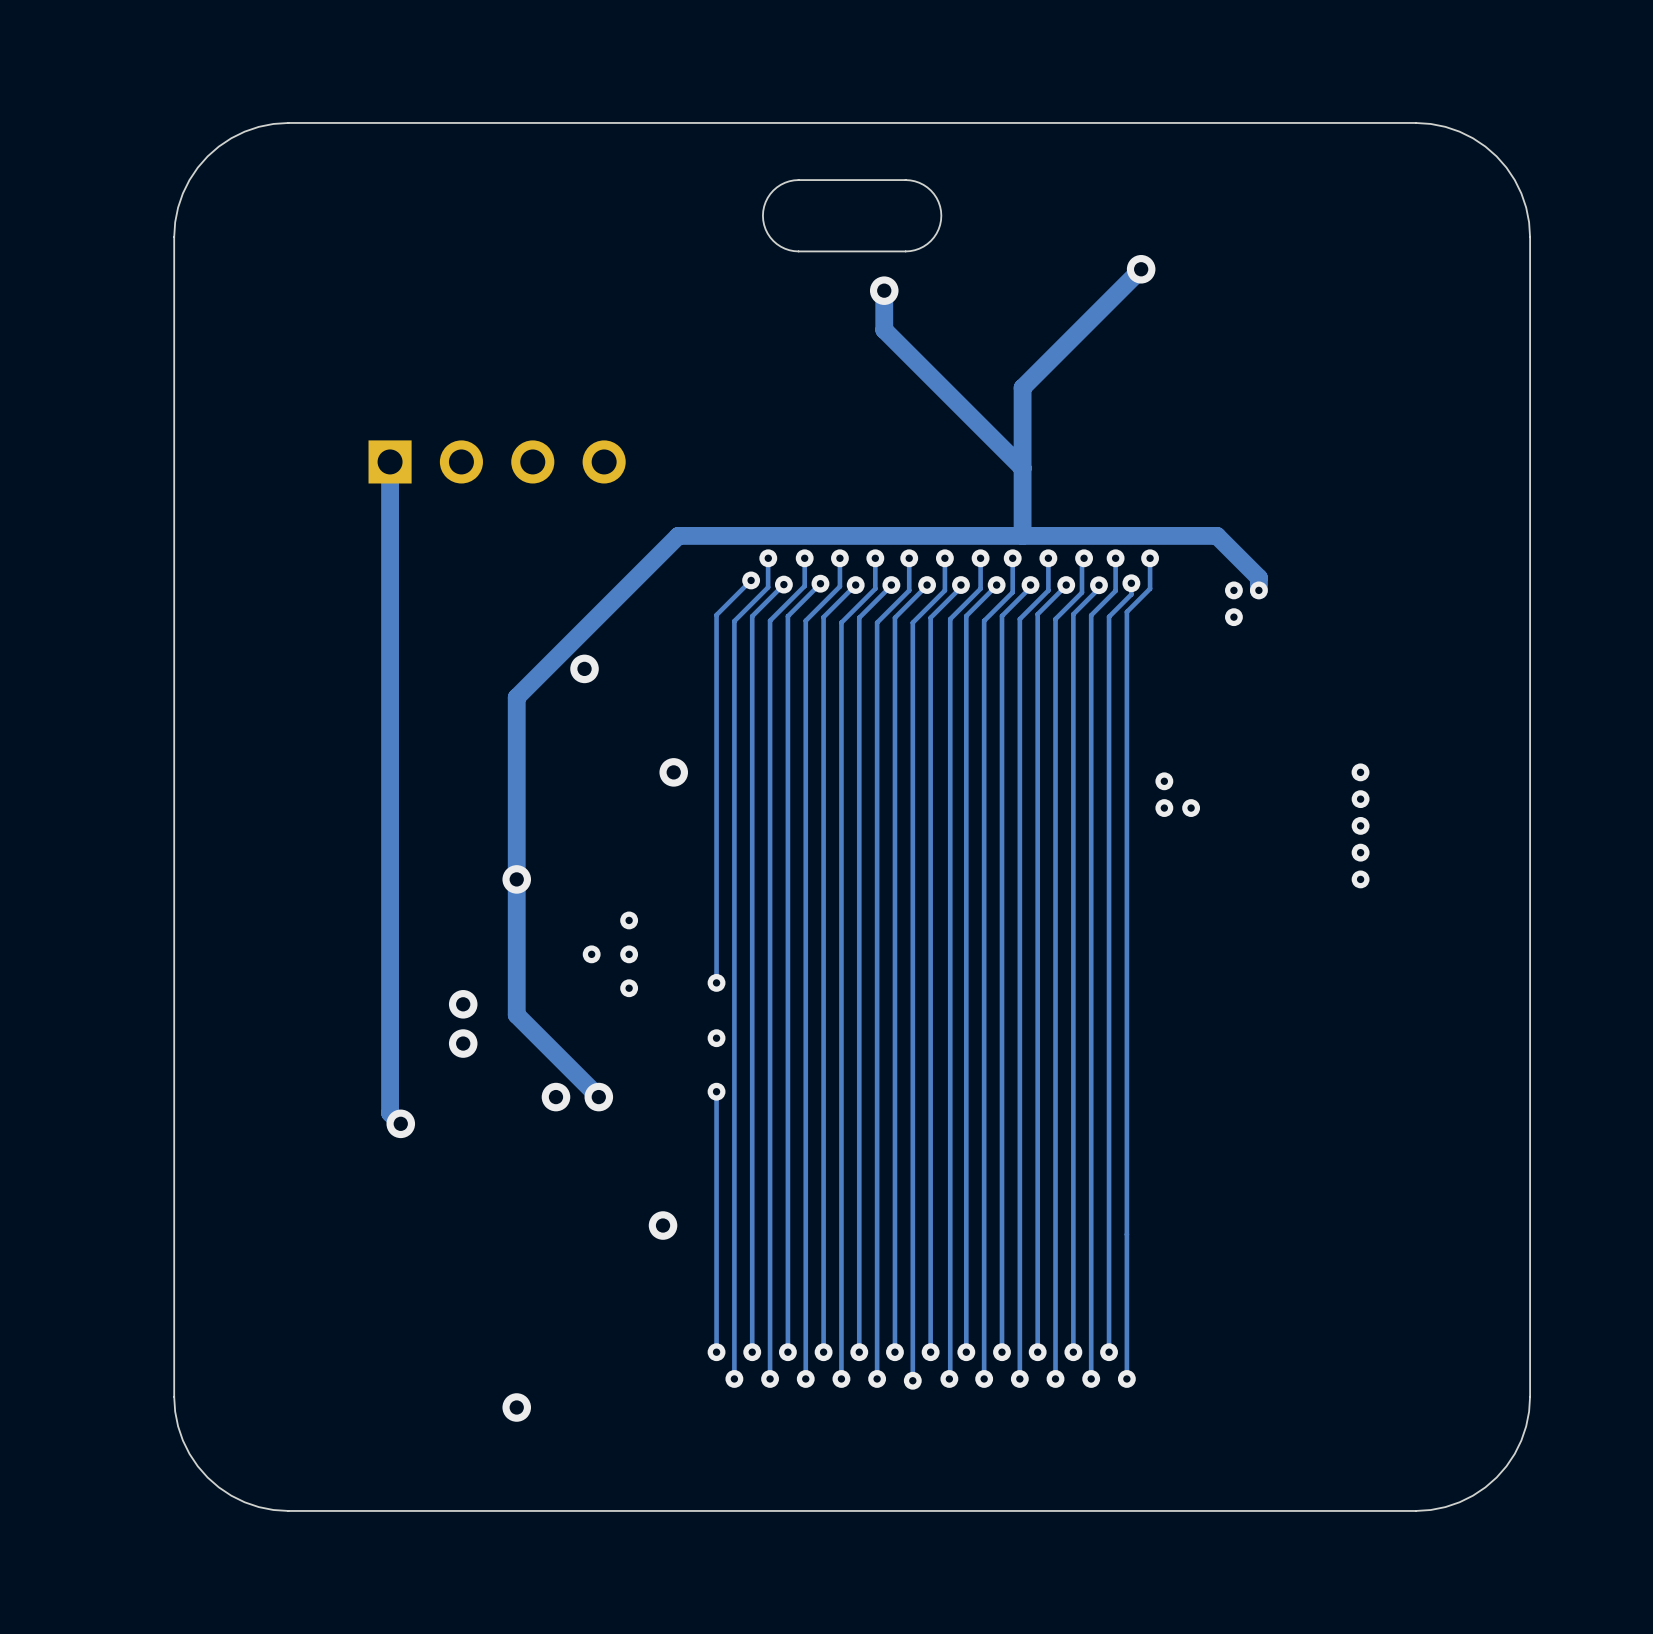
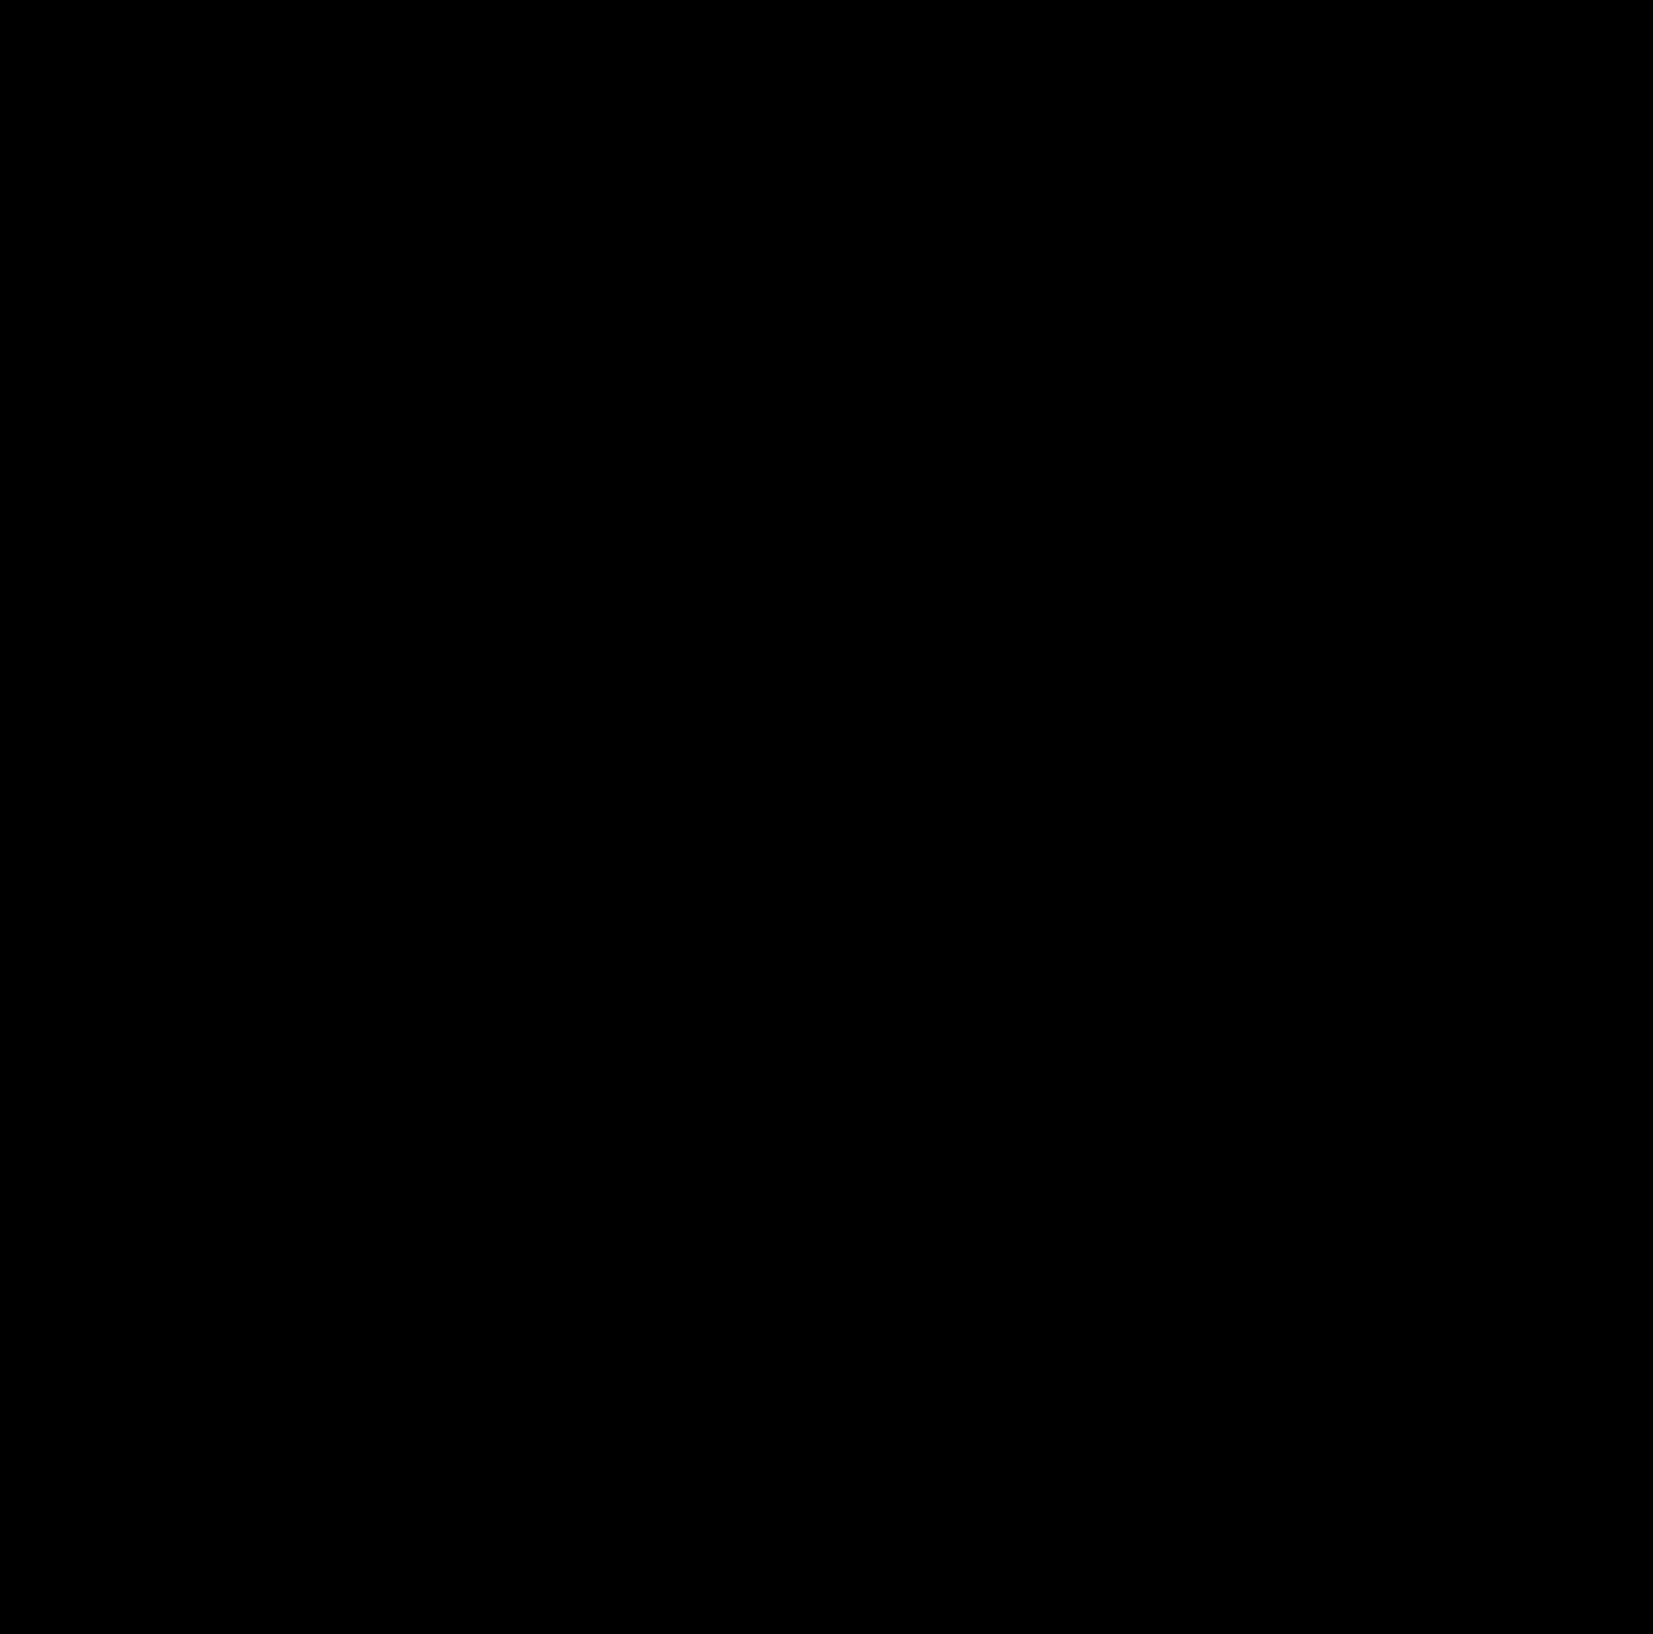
board edge: (1415, 122) (288, 122) (258, 126) (244, 131) (218, 146) (207, 156) (189, 180) (182, 193) (175, 222) (174, 237) (174, 1396) (178, 1426) (182, 1440) (189, 1453) (207, 1477) (218, 1487) (244, 1502) (258, 1507) (288, 1510) (1415, 1510) (1445, 1507) (1459, 1502) (1485, 1487) (1496, 1477) (1514, 1453) (1521, 1440) (1529, 1411) (1530, 1396) (1530, 237) (1526, 207) (1521, 193) (1514, 180) (1496, 156) (1485, 146) (1459, 131) (1445, 126) (1415, 122) -> none
board edge: (905, 180) (789, 181) (776, 187) (767, 197) (763, 211) (764, 224) (773, 240) (784, 248) (793, 251) (914, 250) (927, 244) (933, 237) (940, 224) (941, 211) (936, 197) (930, 190) (919, 182) (905, 180) -> none
track: (1141, 269) (1022, 387) (1022, 535) -> none
via: (1141, 269) -> none
track: (884, 290) (884, 329) (1022, 468) -> none
via: (884, 290) -> none
track: (390, 461) (390, 1113) (400, 1123) -> none
part: (497, 461) -> none
track: (768, 558) (768, 587) (734, 621) (734, 1378) -> none
via: (768, 558) -> none
track: (804, 558) (804, 586) (770, 620) (770, 1378) -> none
via: (804, 558) -> none
track: (839, 558) (839, 586) (805, 620) (805, 1378) -> none
via: (839, 558) -> none
track: (875, 558) (875, 588) (841, 622) (841, 1378) -> none
via: (875, 558) -> none
track: (909, 558) (909, 590) (877, 622) (877, 1378) -> none
via: (909, 558) -> none
track: (944, 558) (944, 590) (912, 622) (912, 1380) -> none
via: (944, 558) -> none
track: (980, 558) (980, 588) (950, 619) (949, 1383) -> none
via: (980, 558) -> none
track: (1012, 558) (1012, 592) (984, 620) (984, 1381) -> none
via: (1012, 558) -> none
track: (1048, 558) (1048, 590) (1019, 619) (1019, 1380) -> none
via: (1048, 558) -> none
track: (1084, 558) (1082, 560) (1082, 592) (1055, 619) (1055, 1381) -> none
via: (1084, 558) -> none
track: (1115, 558) (1115, 590) (1091, 615) (1091, 1380) -> none
via: (1115, 558) -> none
track: (1150, 558) (1150, 588) (1126, 611) (1126, 1380) -> none
via: (1150, 558) -> none
track: (751, 580) (716, 615) (716, 982) -> none
via: (751, 580) -> none
track: (820, 583) (787, 616) (787, 1352) -> none
via: (820, 583) -> none
track: (1131, 583) (1131, 594) (1109, 616) (1109, 1351) -> none
via: (1131, 583) -> none
track: (783, 584) (752, 616) (752, 1352) -> none
via: (783, 584) -> none
track: (855, 585) (823, 617) (823, 1352) -> none
via: (855, 585) -> none
track: (891, 585) (859, 617) (859, 1352) -> none
via: (891, 585) -> none
track: (927, 585) (894, 617) (894, 1352) -> none
via: (927, 585) -> none
track: (960, 585) (960, 587) (930, 617) (930, 1352) -> none
via: (960, 585) -> none
track: (996, 585) (966, 616) (966, 1352) -> none
via: (996, 585) -> none
track: (1030, 585) (1030, 587) (1002, 616) (1002, 1352) -> none
via: (1030, 585) -> none
track: (1066, 585) (1037, 614) (1037, 1352) -> none
via: (1066, 585) -> none
track: (1098, 585) (1098, 588) (1073, 614) (1073, 1352) -> none
via: (1098, 585) -> none
via: (1233, 590) -> none
track: (1258, 590) (1258, 577) (1217, 535) (678, 535) (516, 697) (516, 1015) (598, 1097) -> none
via: (1258, 590) -> none
via: (1233, 617) -> none
via: (584, 668) -> none
via: (673, 772) -> none
via: (1360, 772) -> none
via: (1164, 781) -> none
via: (1360, 799) -> none
via: (1164, 808) -> none
via: (1191, 808) -> none
via: (1360, 825) -> none
via: (1360, 852) -> none
via: (516, 879) -> none
via: (1360, 879) -> none
via: (629, 920) -> none
via: (591, 954) -> none
via: (629, 954) -> none
via: (716, 982) -> none
via: (629, 988) -> none
via: (463, 1004) -> none
via: (716, 1038) -> none
via: (463, 1043) -> none
track: (716, 1091) (716, 1352) -> none
via: (716, 1091) -> none
via: (555, 1097) -> none
via: (598, 1097) -> none
via: (400, 1123) -> none
via: (663, 1225) -> none
via: (716, 1352) -> none
via: (752, 1352) -> none
via: (787, 1352) -> none
via: (823, 1352) -> none
via: (859, 1352) -> none
via: (894, 1352) -> none
via: (930, 1352) -> none
via: (966, 1352) -> none
via: (1002, 1352) -> none
via: (1037, 1352) -> none
via: (1073, 1352) -> none
via: (1109, 1352) -> none
via: (734, 1378) -> none
via: (770, 1378) -> none
via: (805, 1378) -> none
via: (841, 1378) -> none
via: (877, 1378) -> none
via: (949, 1378) -> none
via: (984, 1378) -> none
via: (1019, 1378) -> none
via: (1055, 1378) -> none
via: (1091, 1378) -> none
via: (1126, 1378) -> none
via: (912, 1380) -> none
via: (516, 1407) -> none

